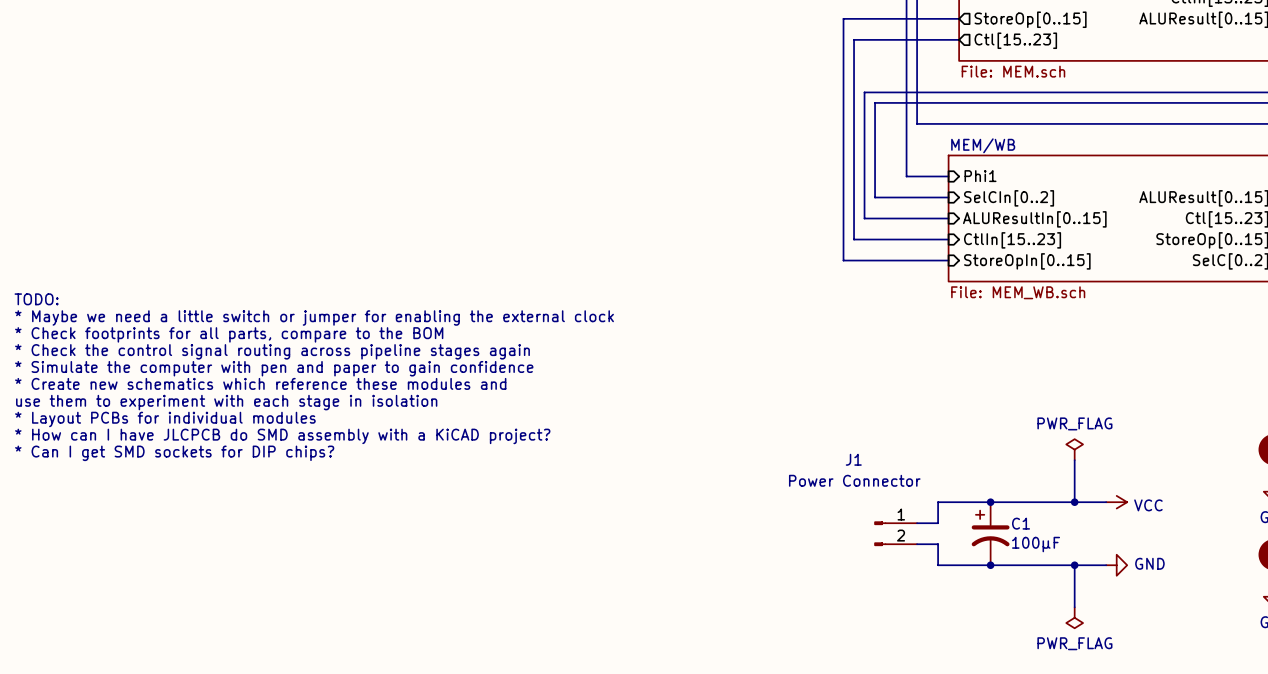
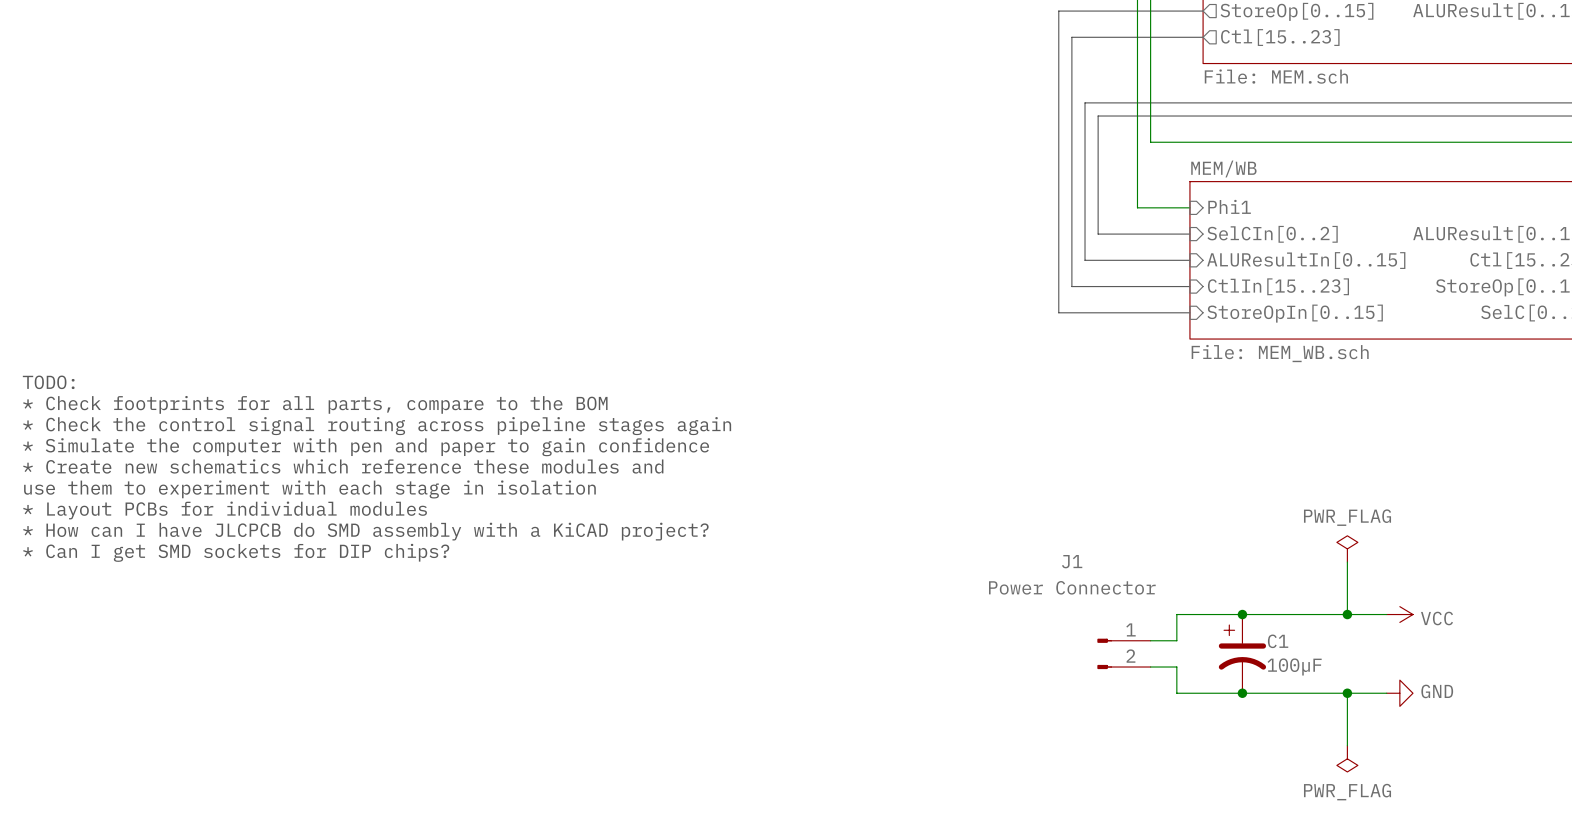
text: TODO: (36, 299) -> none
text: * Maybe we need a little switch or jumper for enabling the external clock (314, 317) -> TODO: (48, 382)

